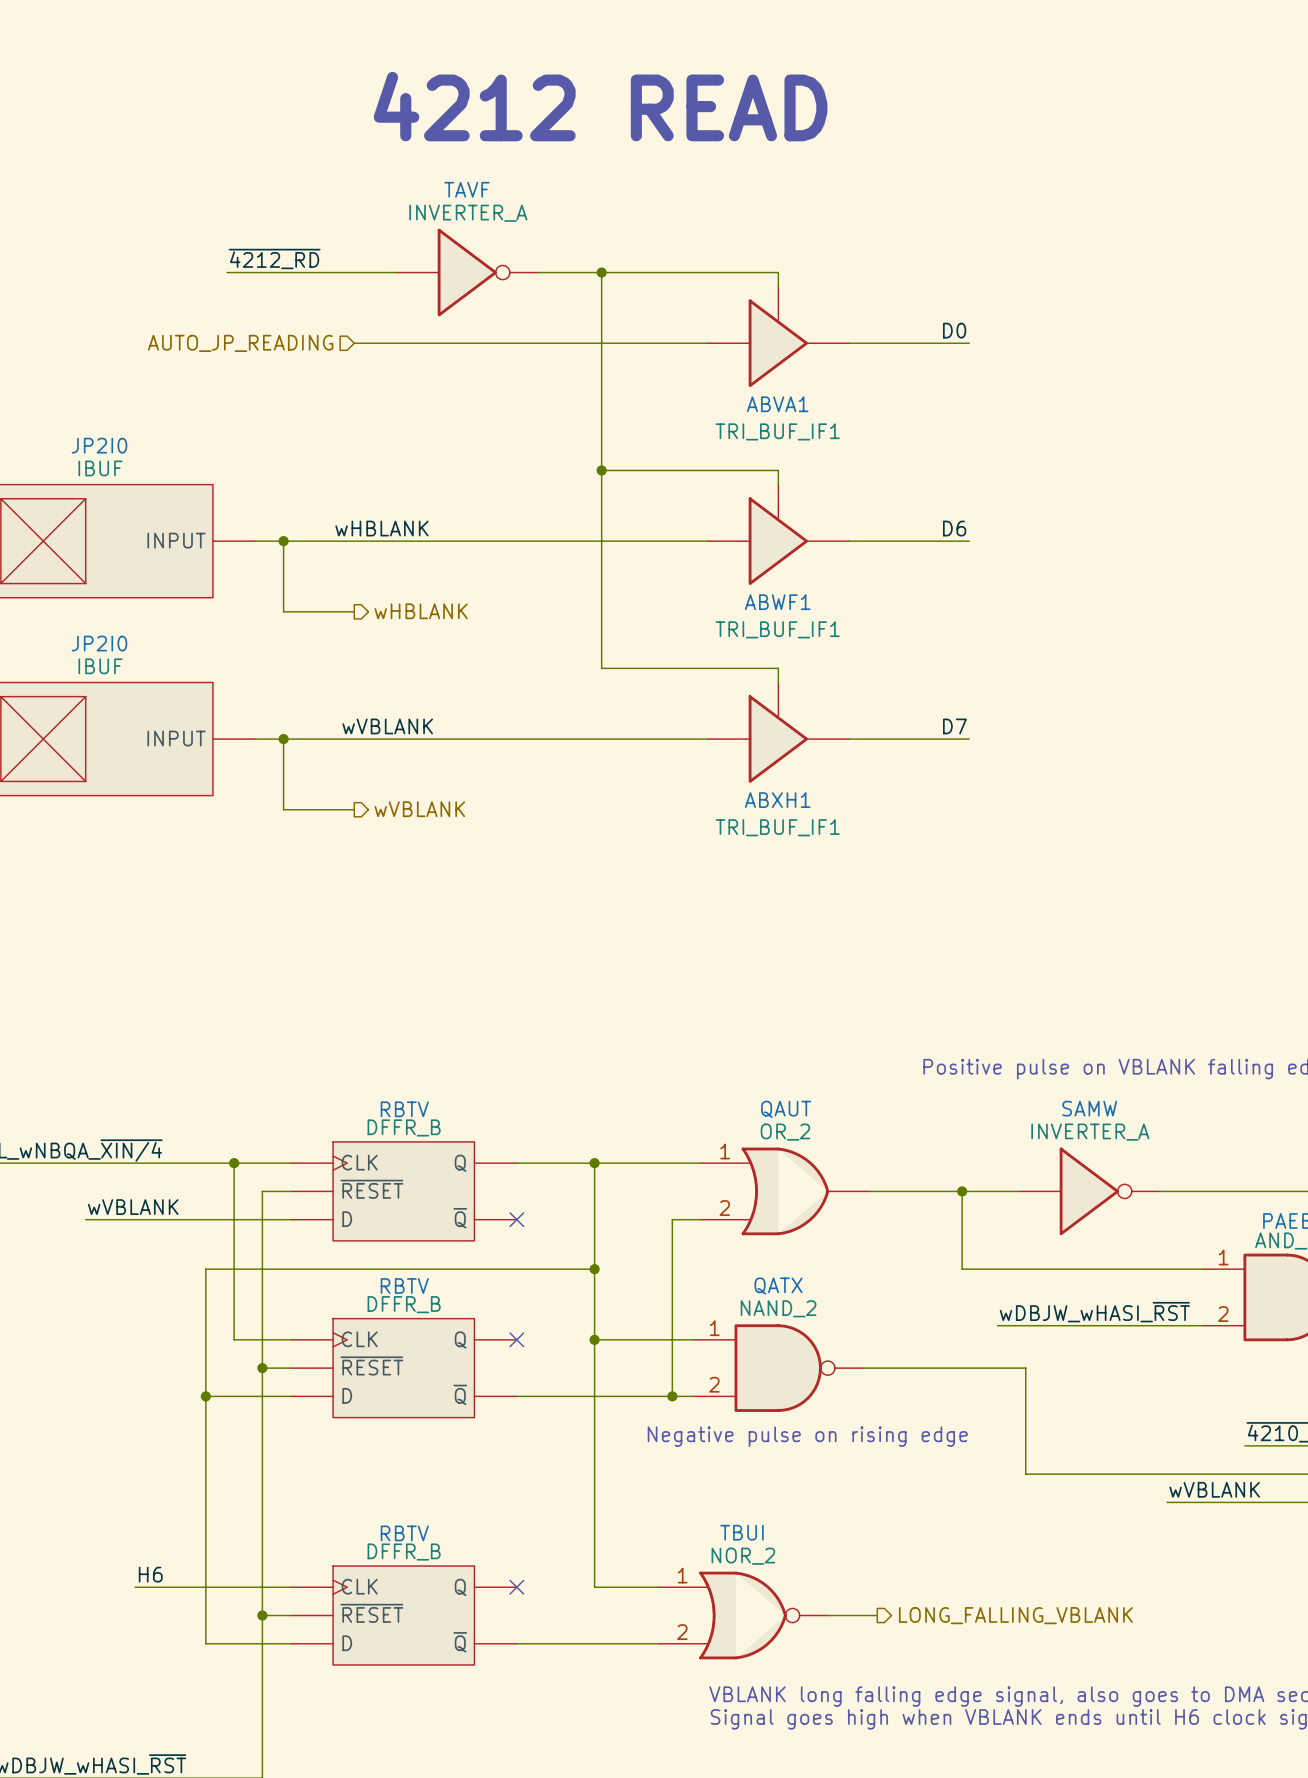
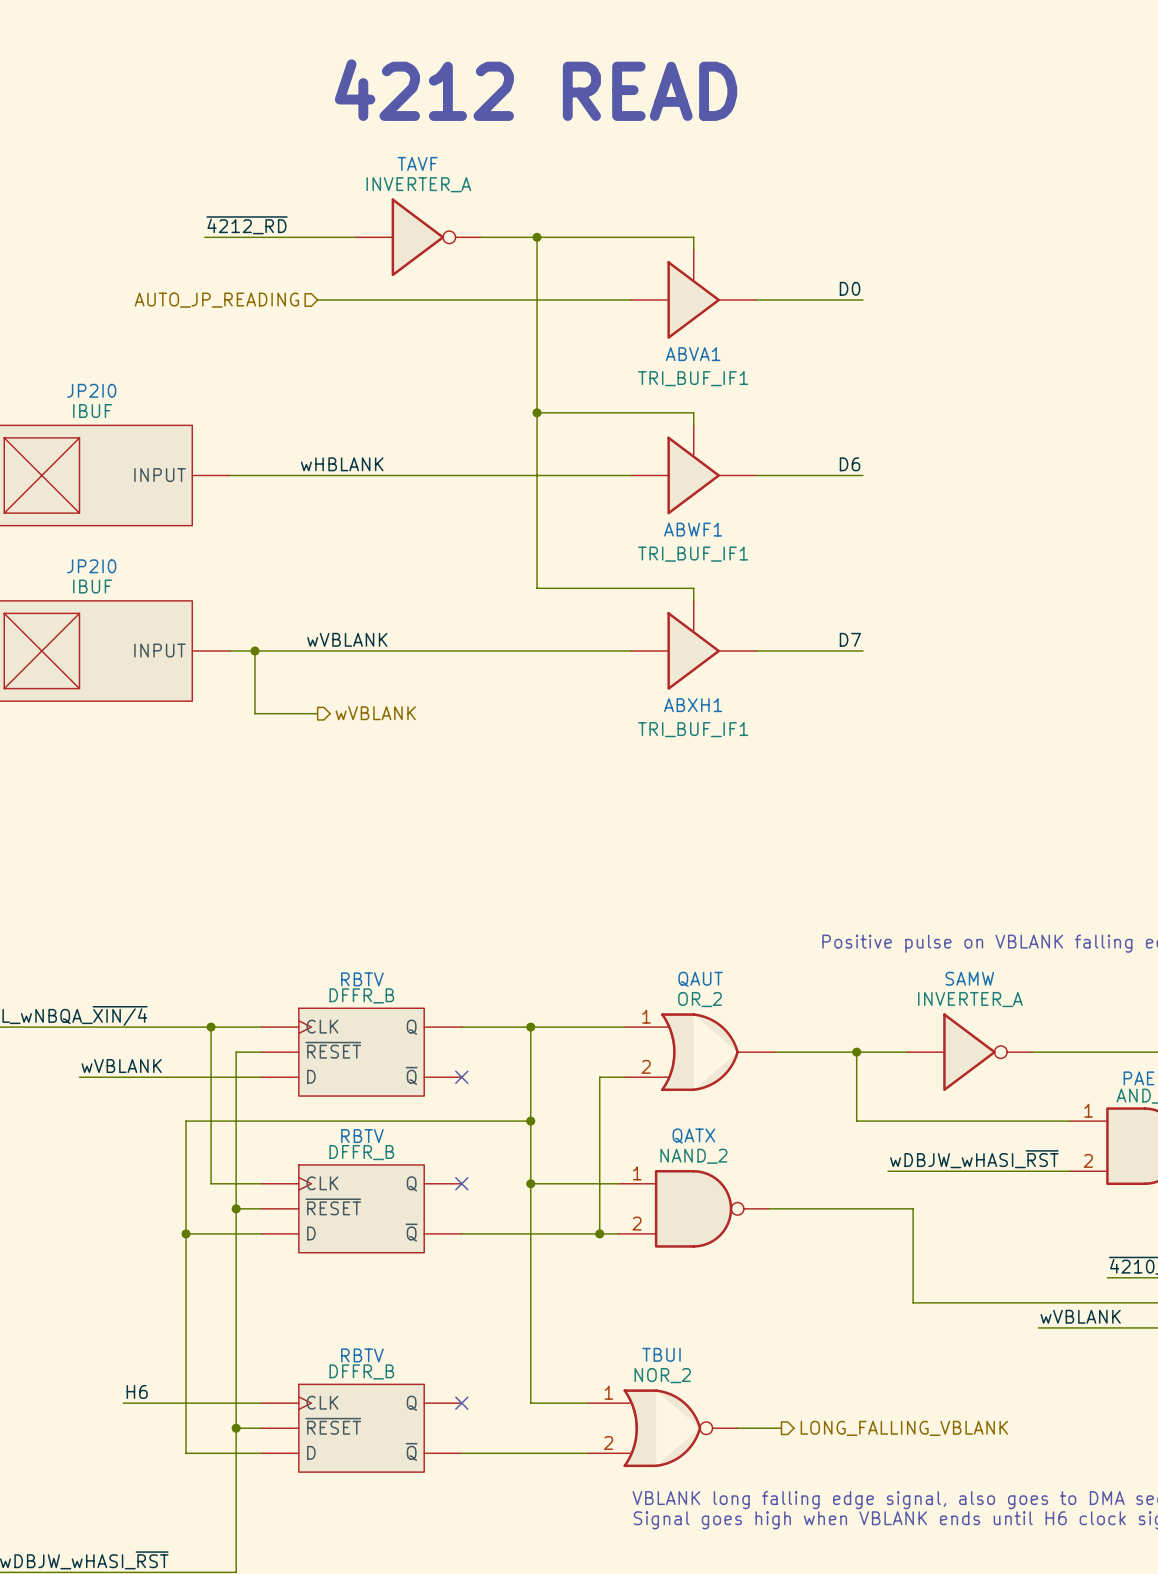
wire: (283, 541) (283, 611) (354, 611) -> none
junction: (283, 541) -> none
hierarchical label: wHBLANK (421, 611) -> none
text: Negative pulse on rising edge (807, 1436) -> none

